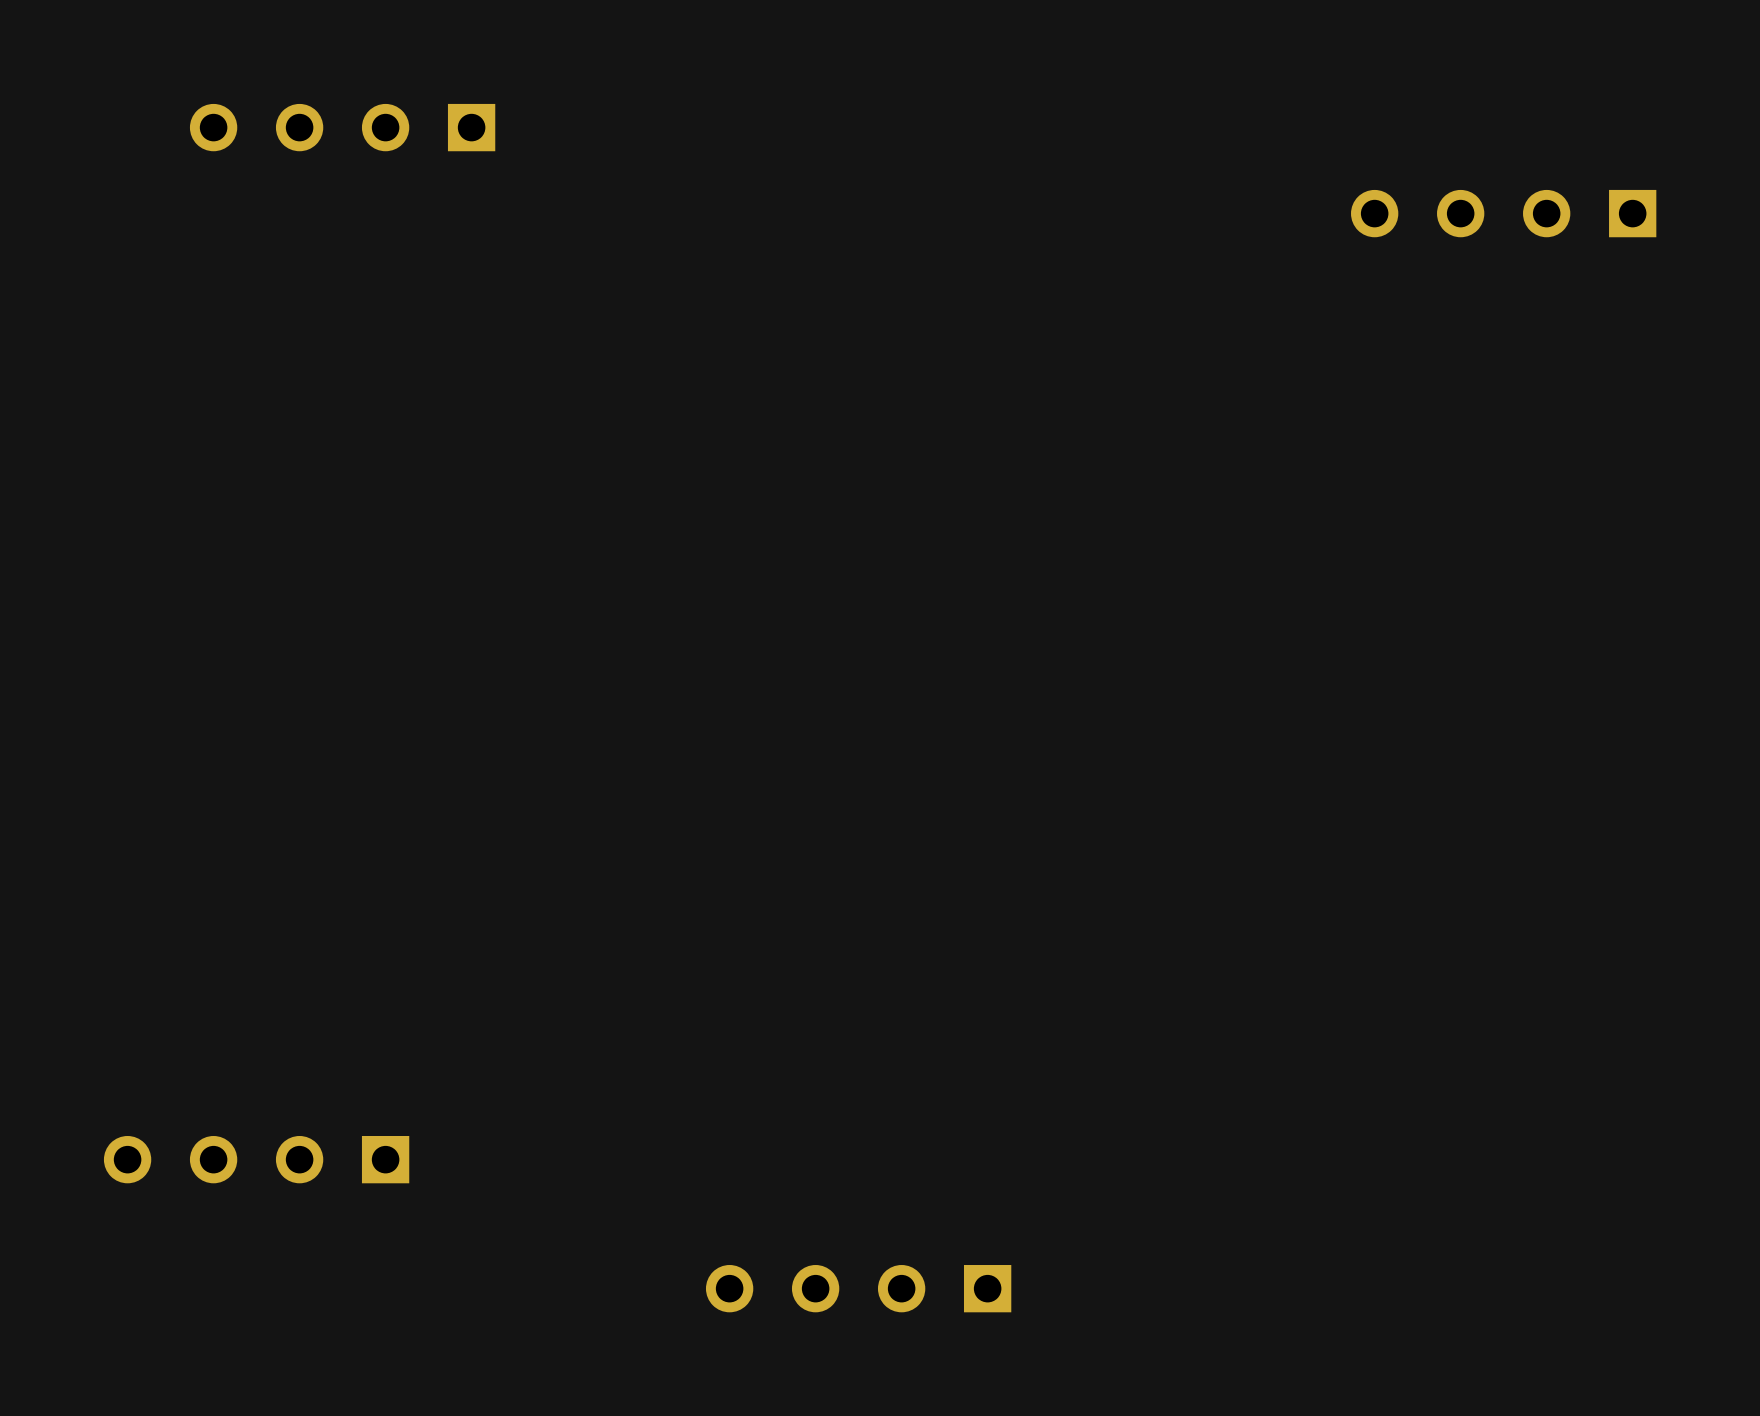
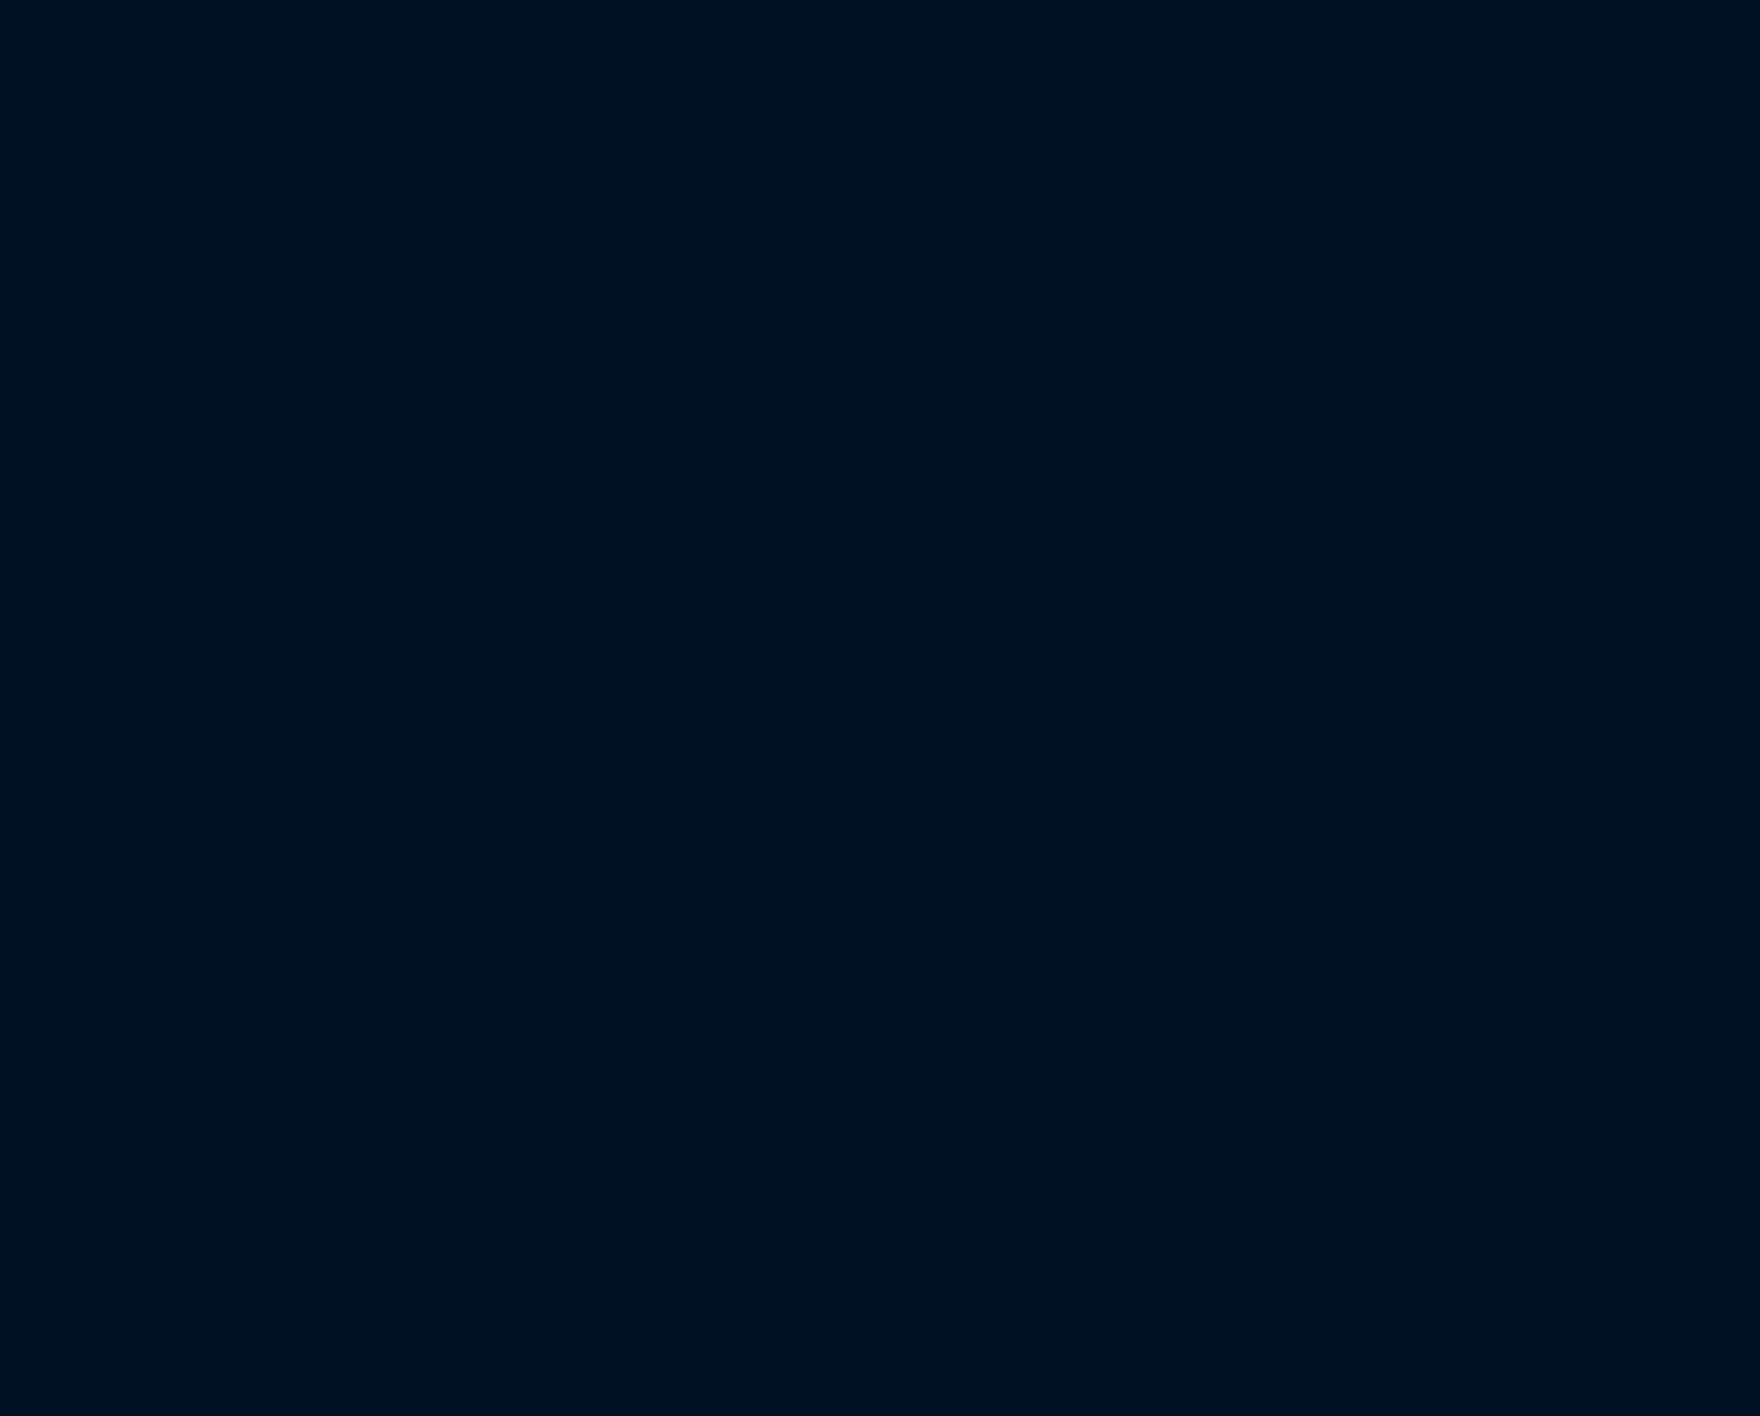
part: (342, 127) -> none
part: (1503, 213) -> none
part: (256, 1159) -> none
part: (858, 1288) -> none

